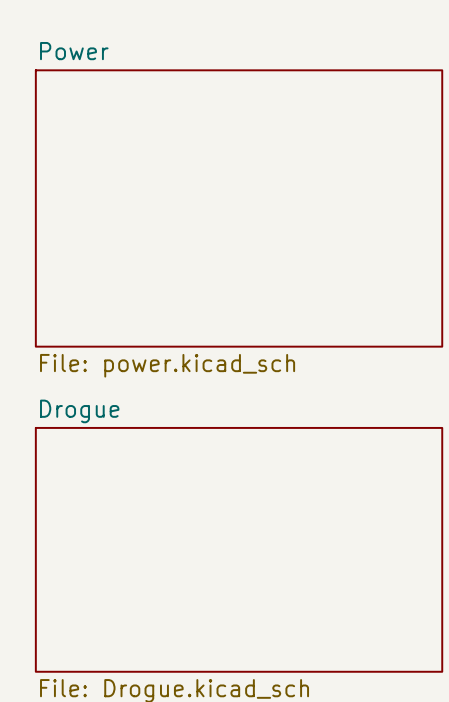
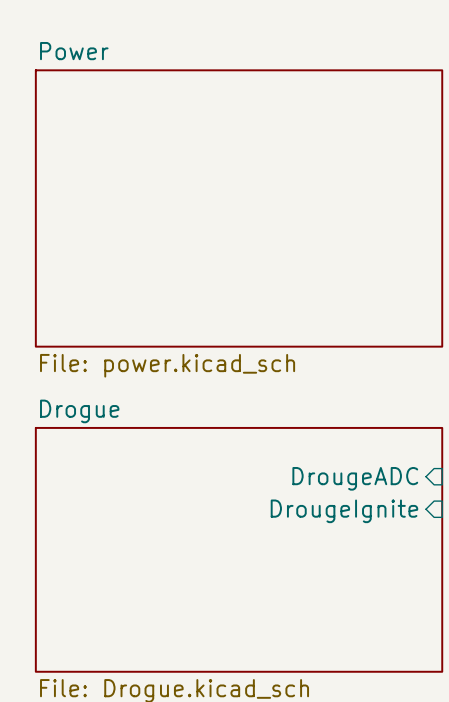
sheet pin: none -> DrougeADC (355, 478)
sheet pin: none -> DrougeIgnite (344, 511)

